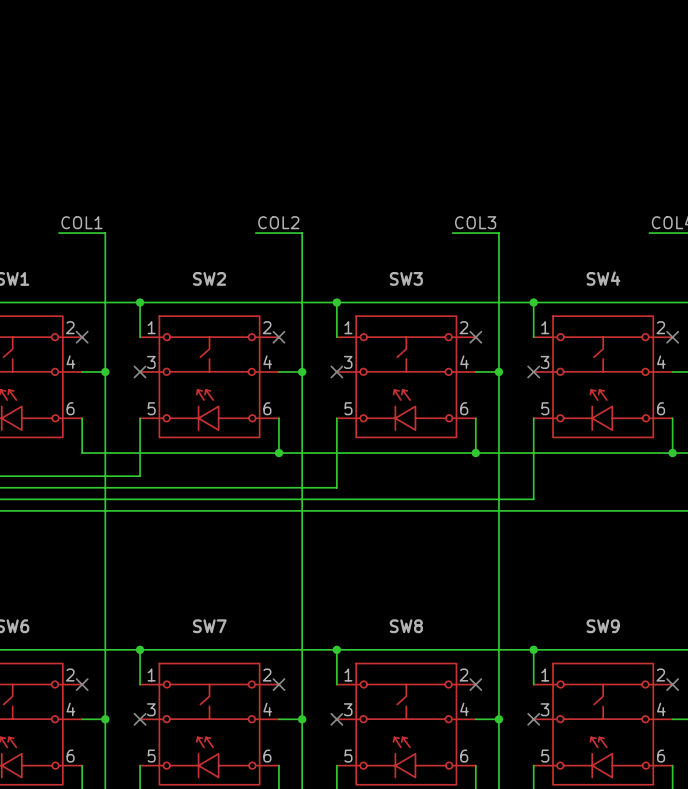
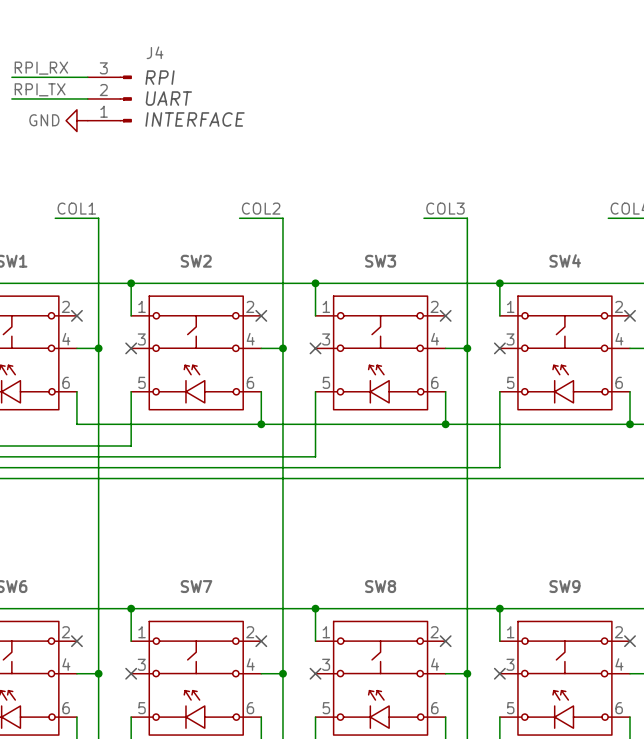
label: none -> RPI_RX (41, 68)
wire: none -> (11, 77) (87, 77)
text: none -> RPI (160, 77)
label: none -> RPI_TX (40, 89)
wire: none -> (11, 98) (87, 98)
J4: none -> (109, 98)
text: none -> UART (168, 98)
text: none -> INTERFACE (195, 119)
power symbol: none -> GND (76, 120)

